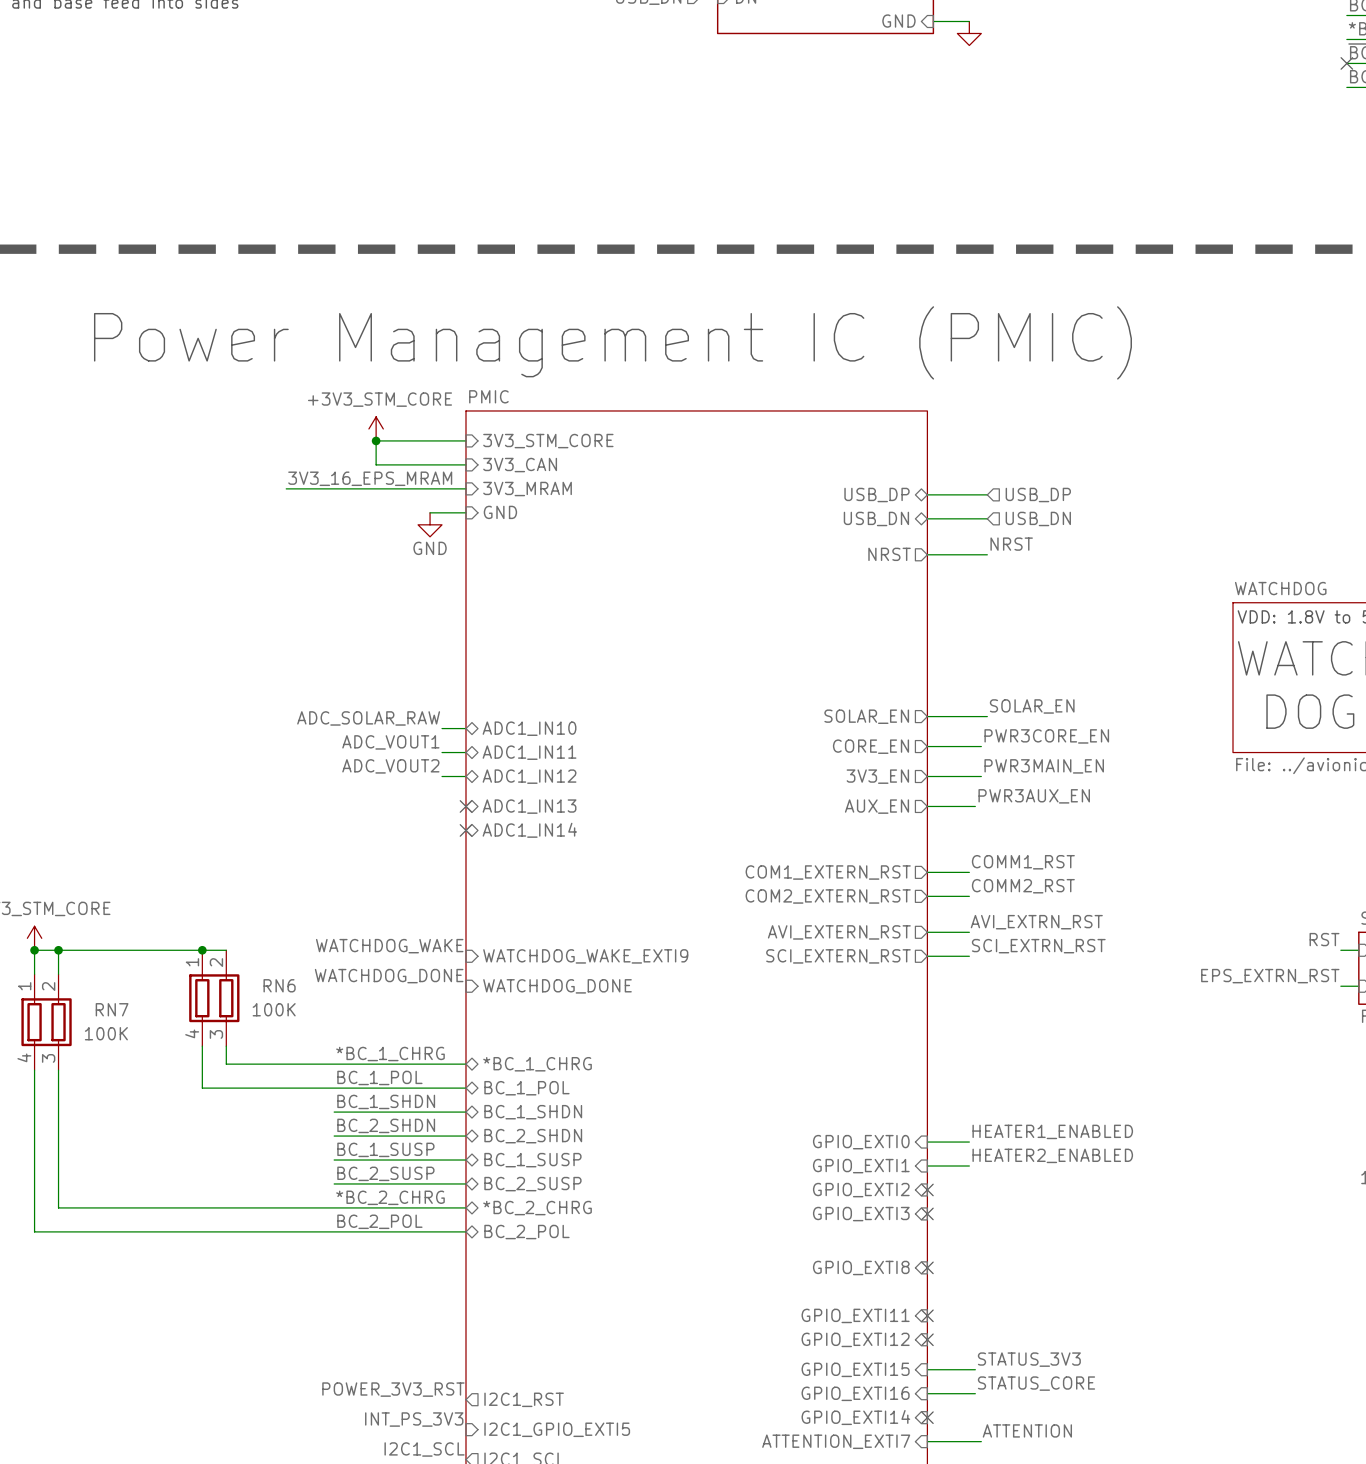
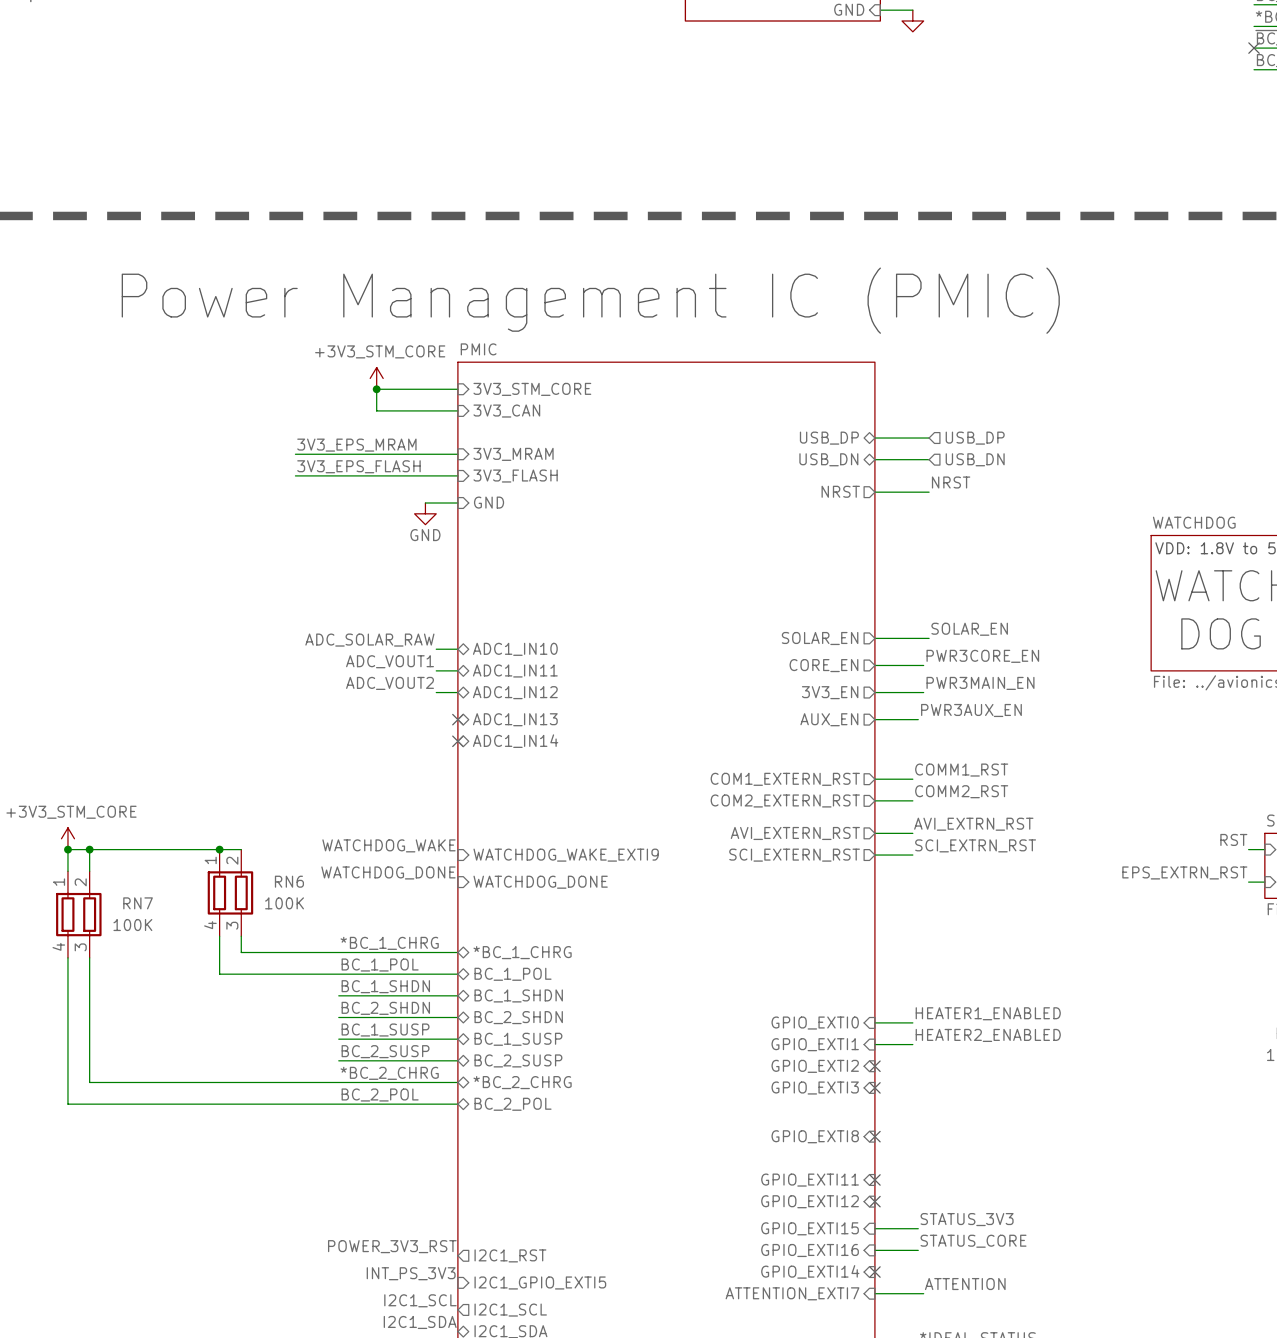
label: 3V3_16_EPS_MRAM (370, 478) -> 3V3_EPS_MRAM (356, 445)
wire: (286, 488) (466, 488) -> (295, 475) (457, 475)
sheet pin: 3V3_MRAM (527, 489) -> none
wire: none -> (295, 454) (425, 454)
sheet pin: GND (500, 512) -> 3V3_MRAM (513, 454)
power symbol position: GND (430, 524) -> GND (425, 513)
label: none -> 3V3_EPS_FLASH (358, 466)
sheet pin: none -> 3V3_FLASH (515, 476)
wire: none -> (425, 503) (457, 503)
sheet pin: none -> GND (489, 502)

